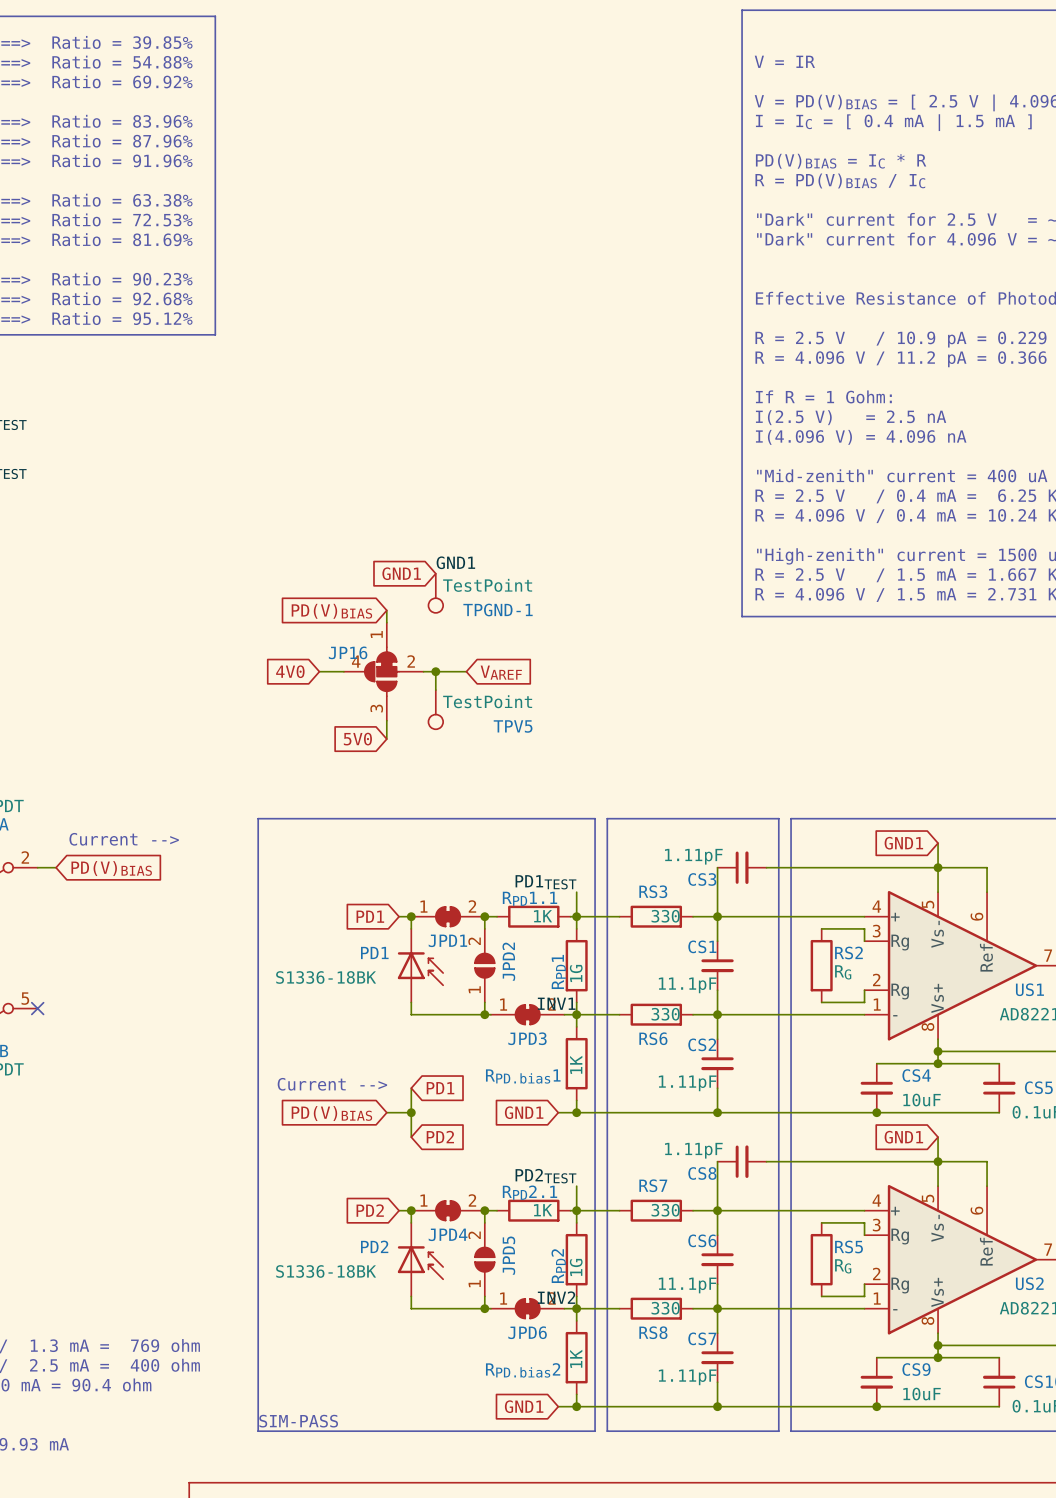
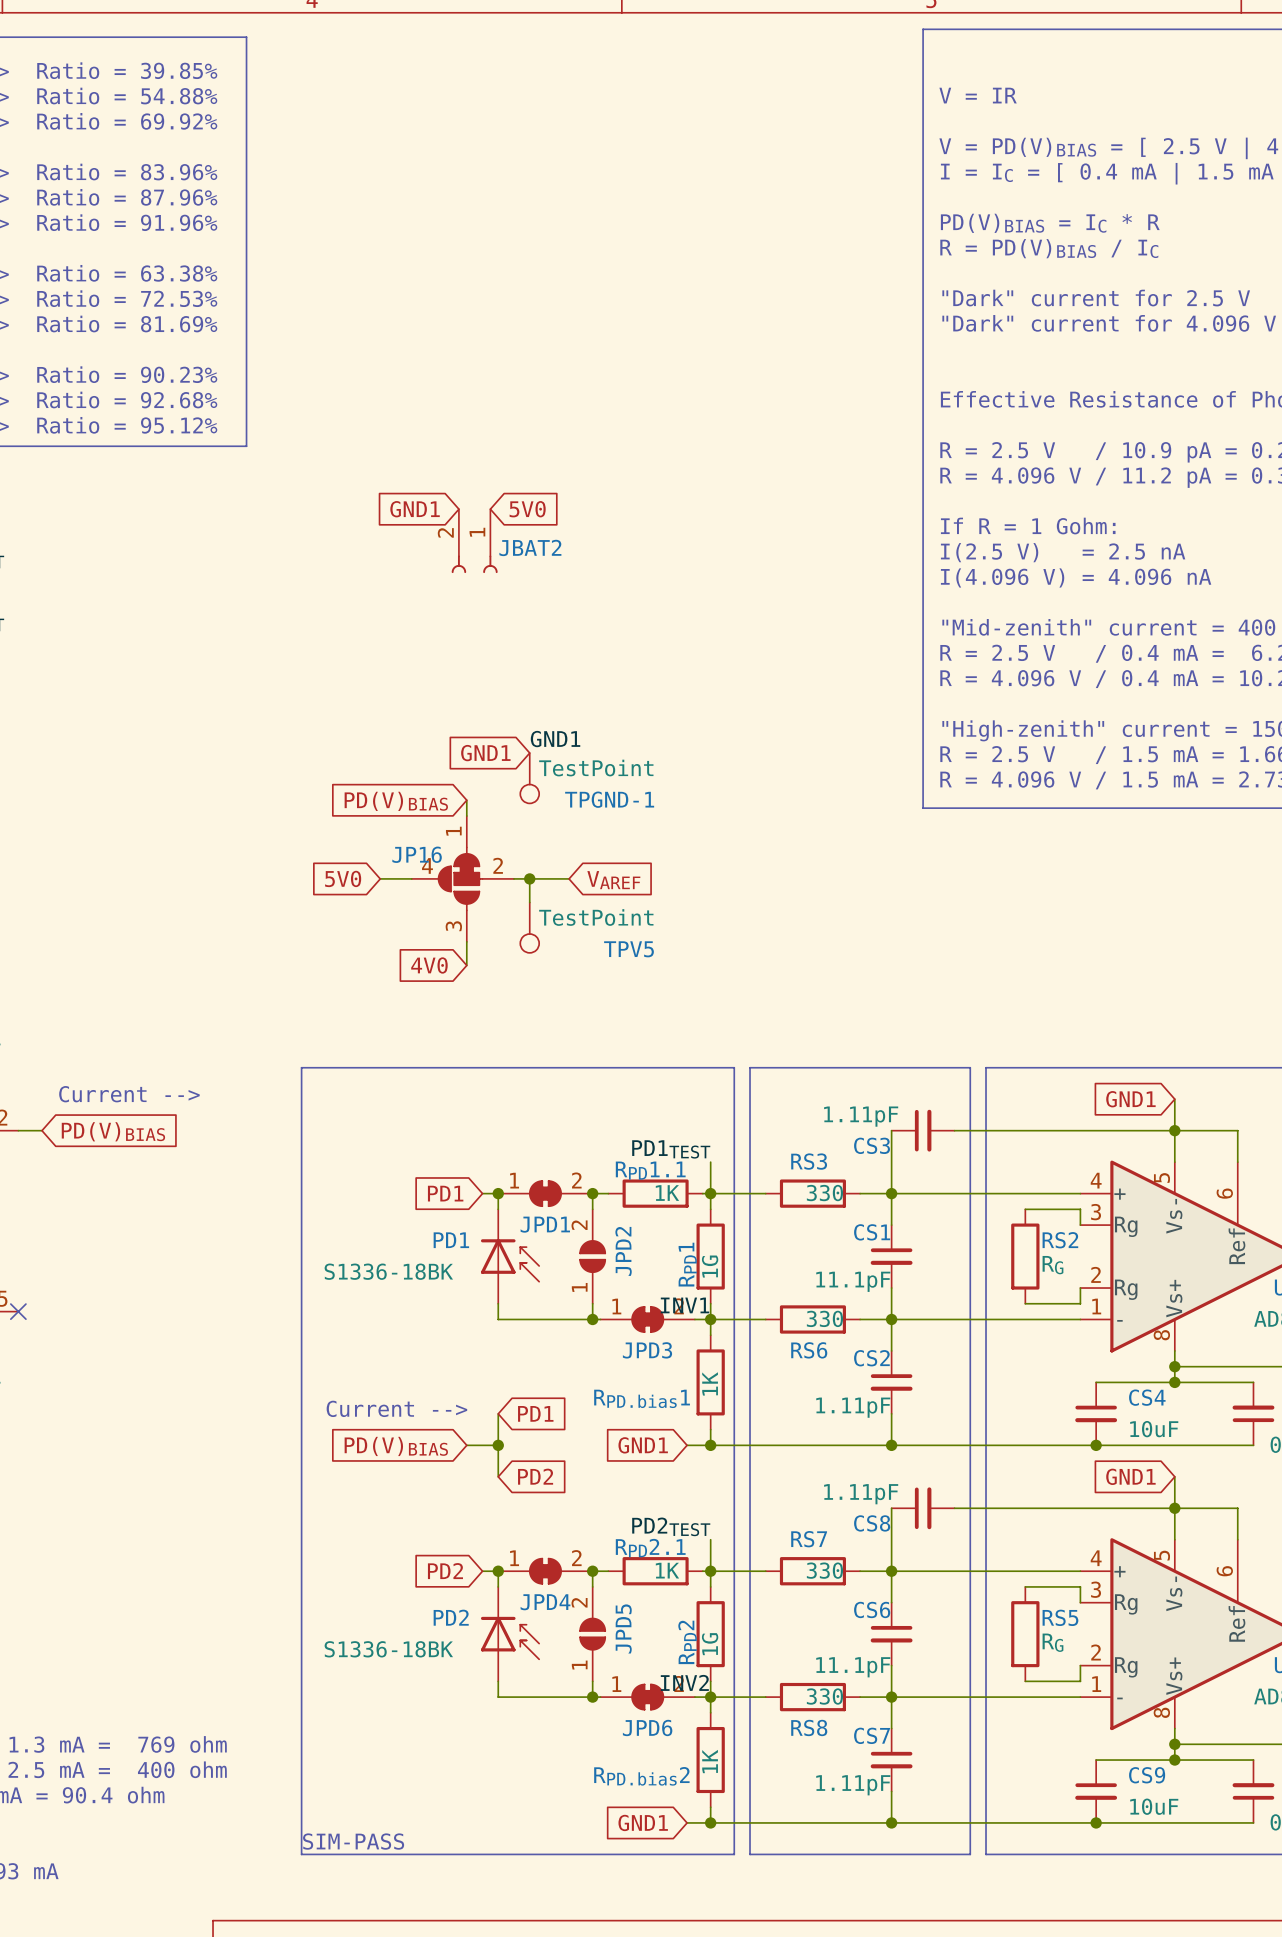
global label: none -> GND1 (415, 509)
global label: none -> 5V0 (527, 509)
JBAT2: none -> (474, 541)
global label: 4V0 (290, 671) -> 5V0 (343, 878)
global label: 5V0 (357, 739) -> 4V0 (429, 965)

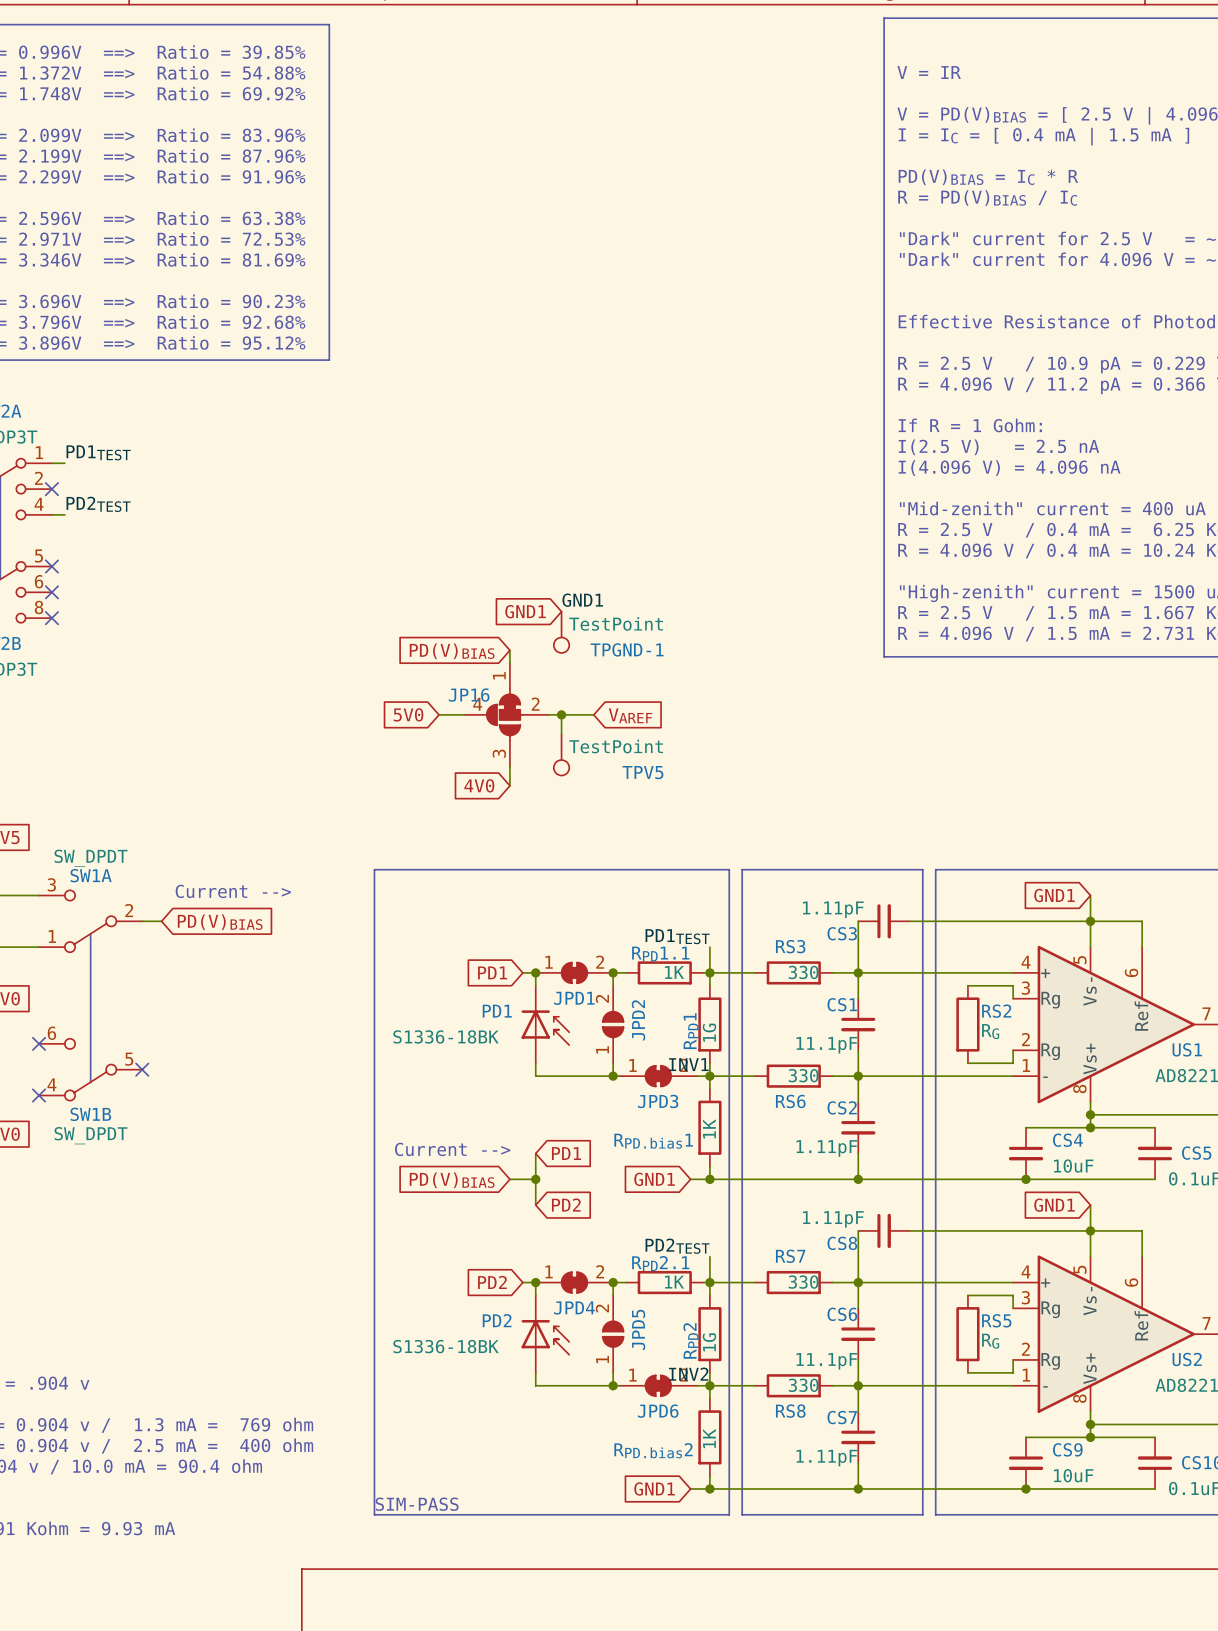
global label: GND1 (415, 509) -> none
global label: 5V0 (527, 509) -> none
JBAT2: (474, 541) -> none

